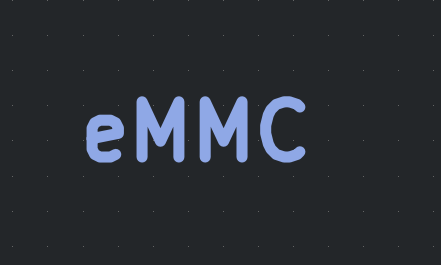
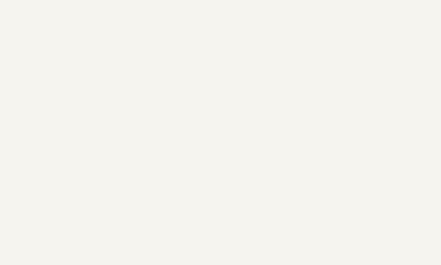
text: eMMC (195, 129) -> none

